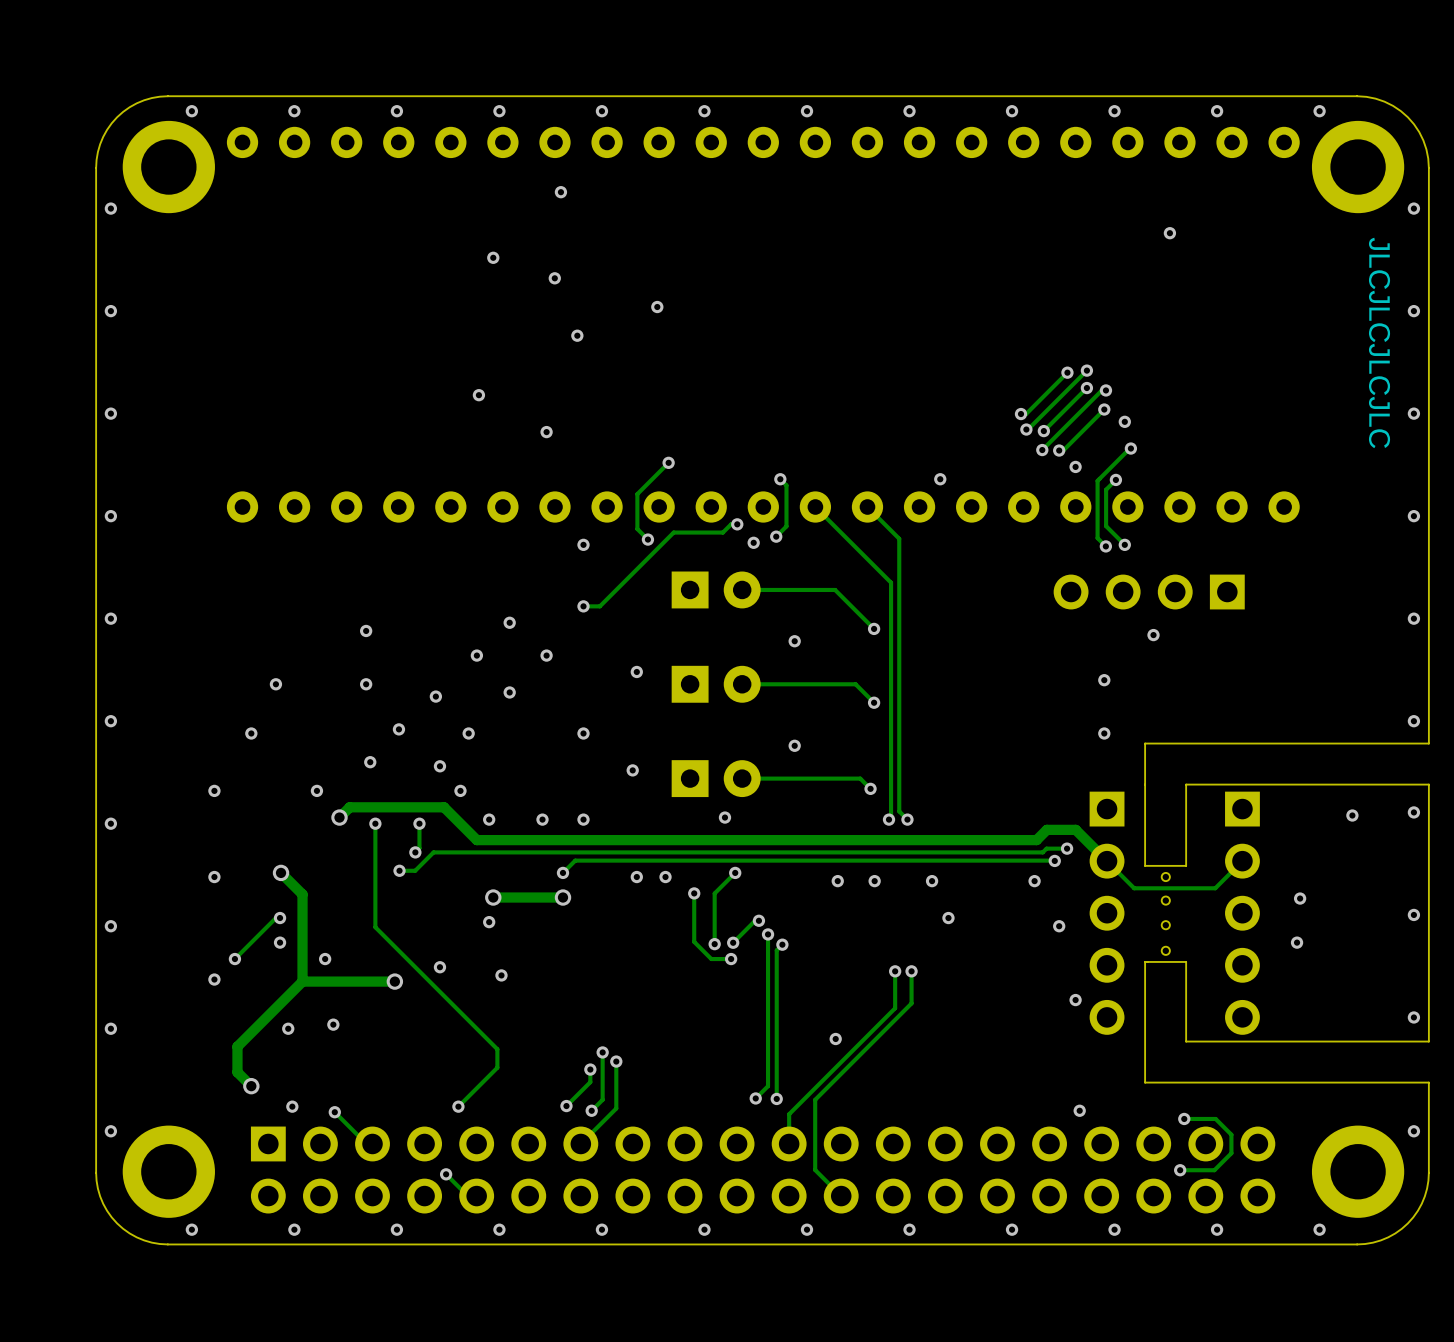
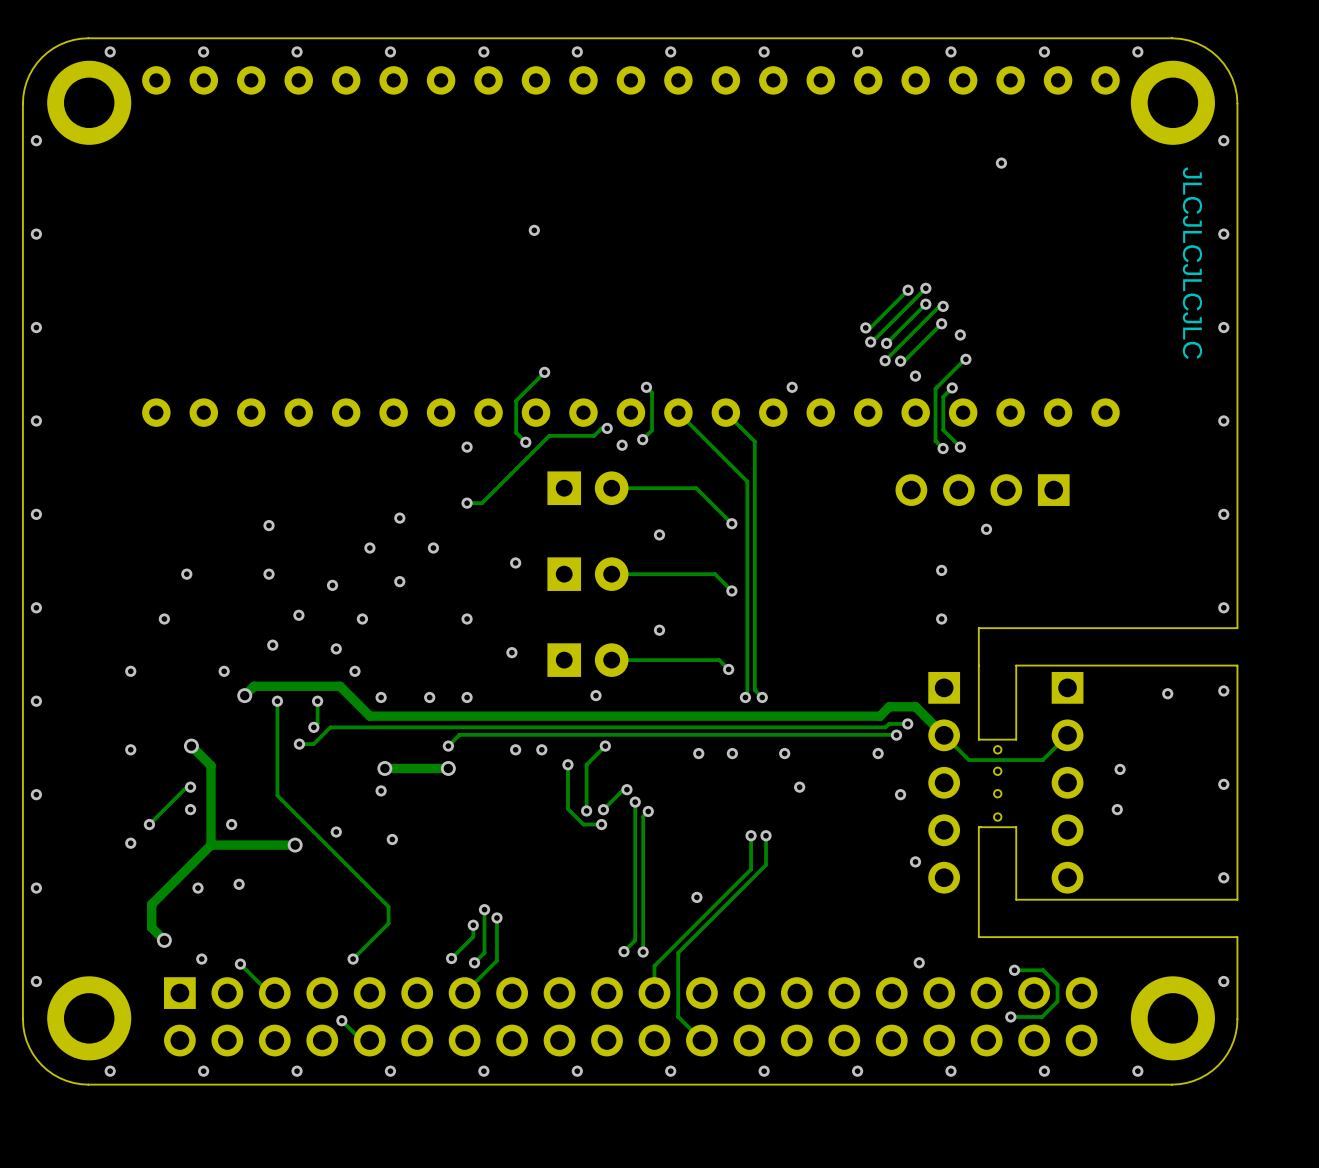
via: (560, 192) -> none
via: (493, 257) -> none
via: (554, 278) -> none
via: (577, 335) -> none
via: (478, 395) -> none
via: (546, 432) -> none

